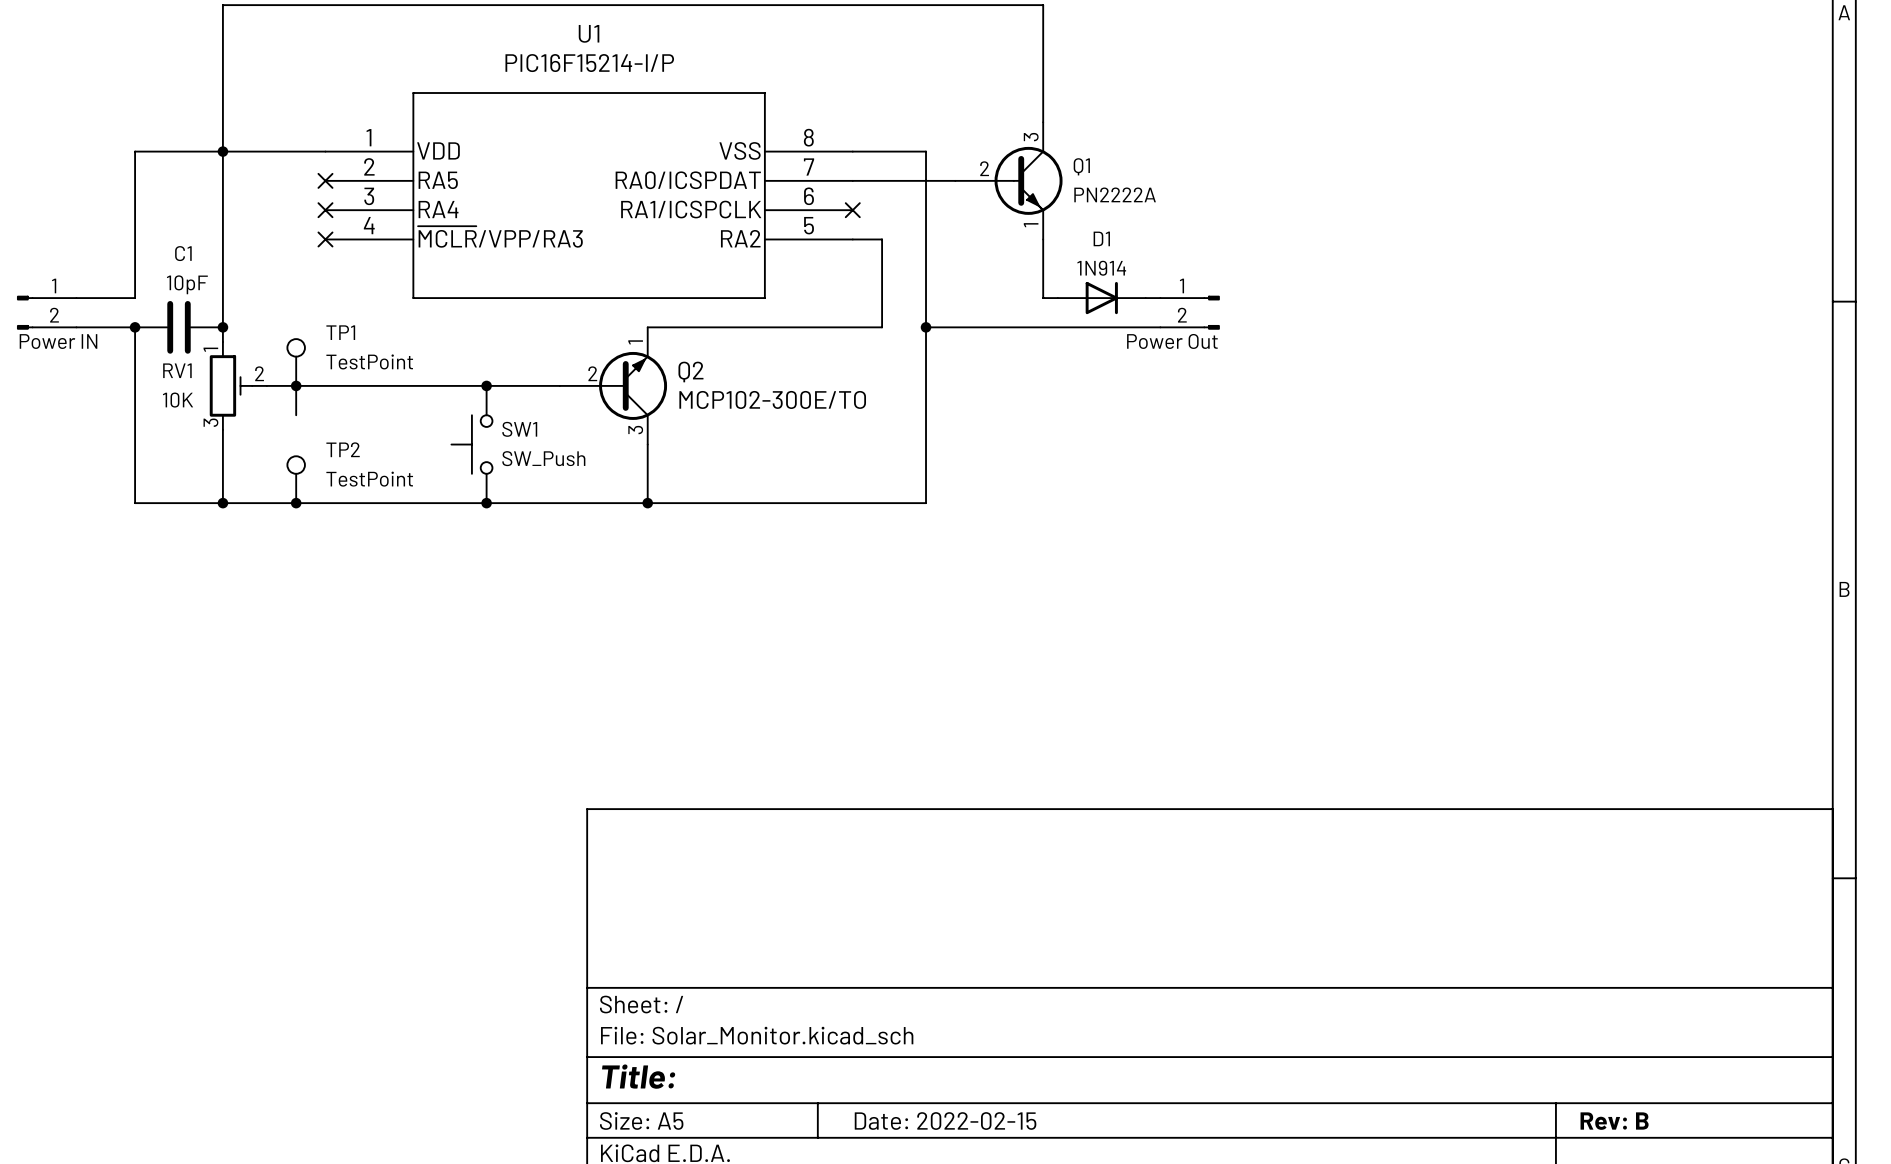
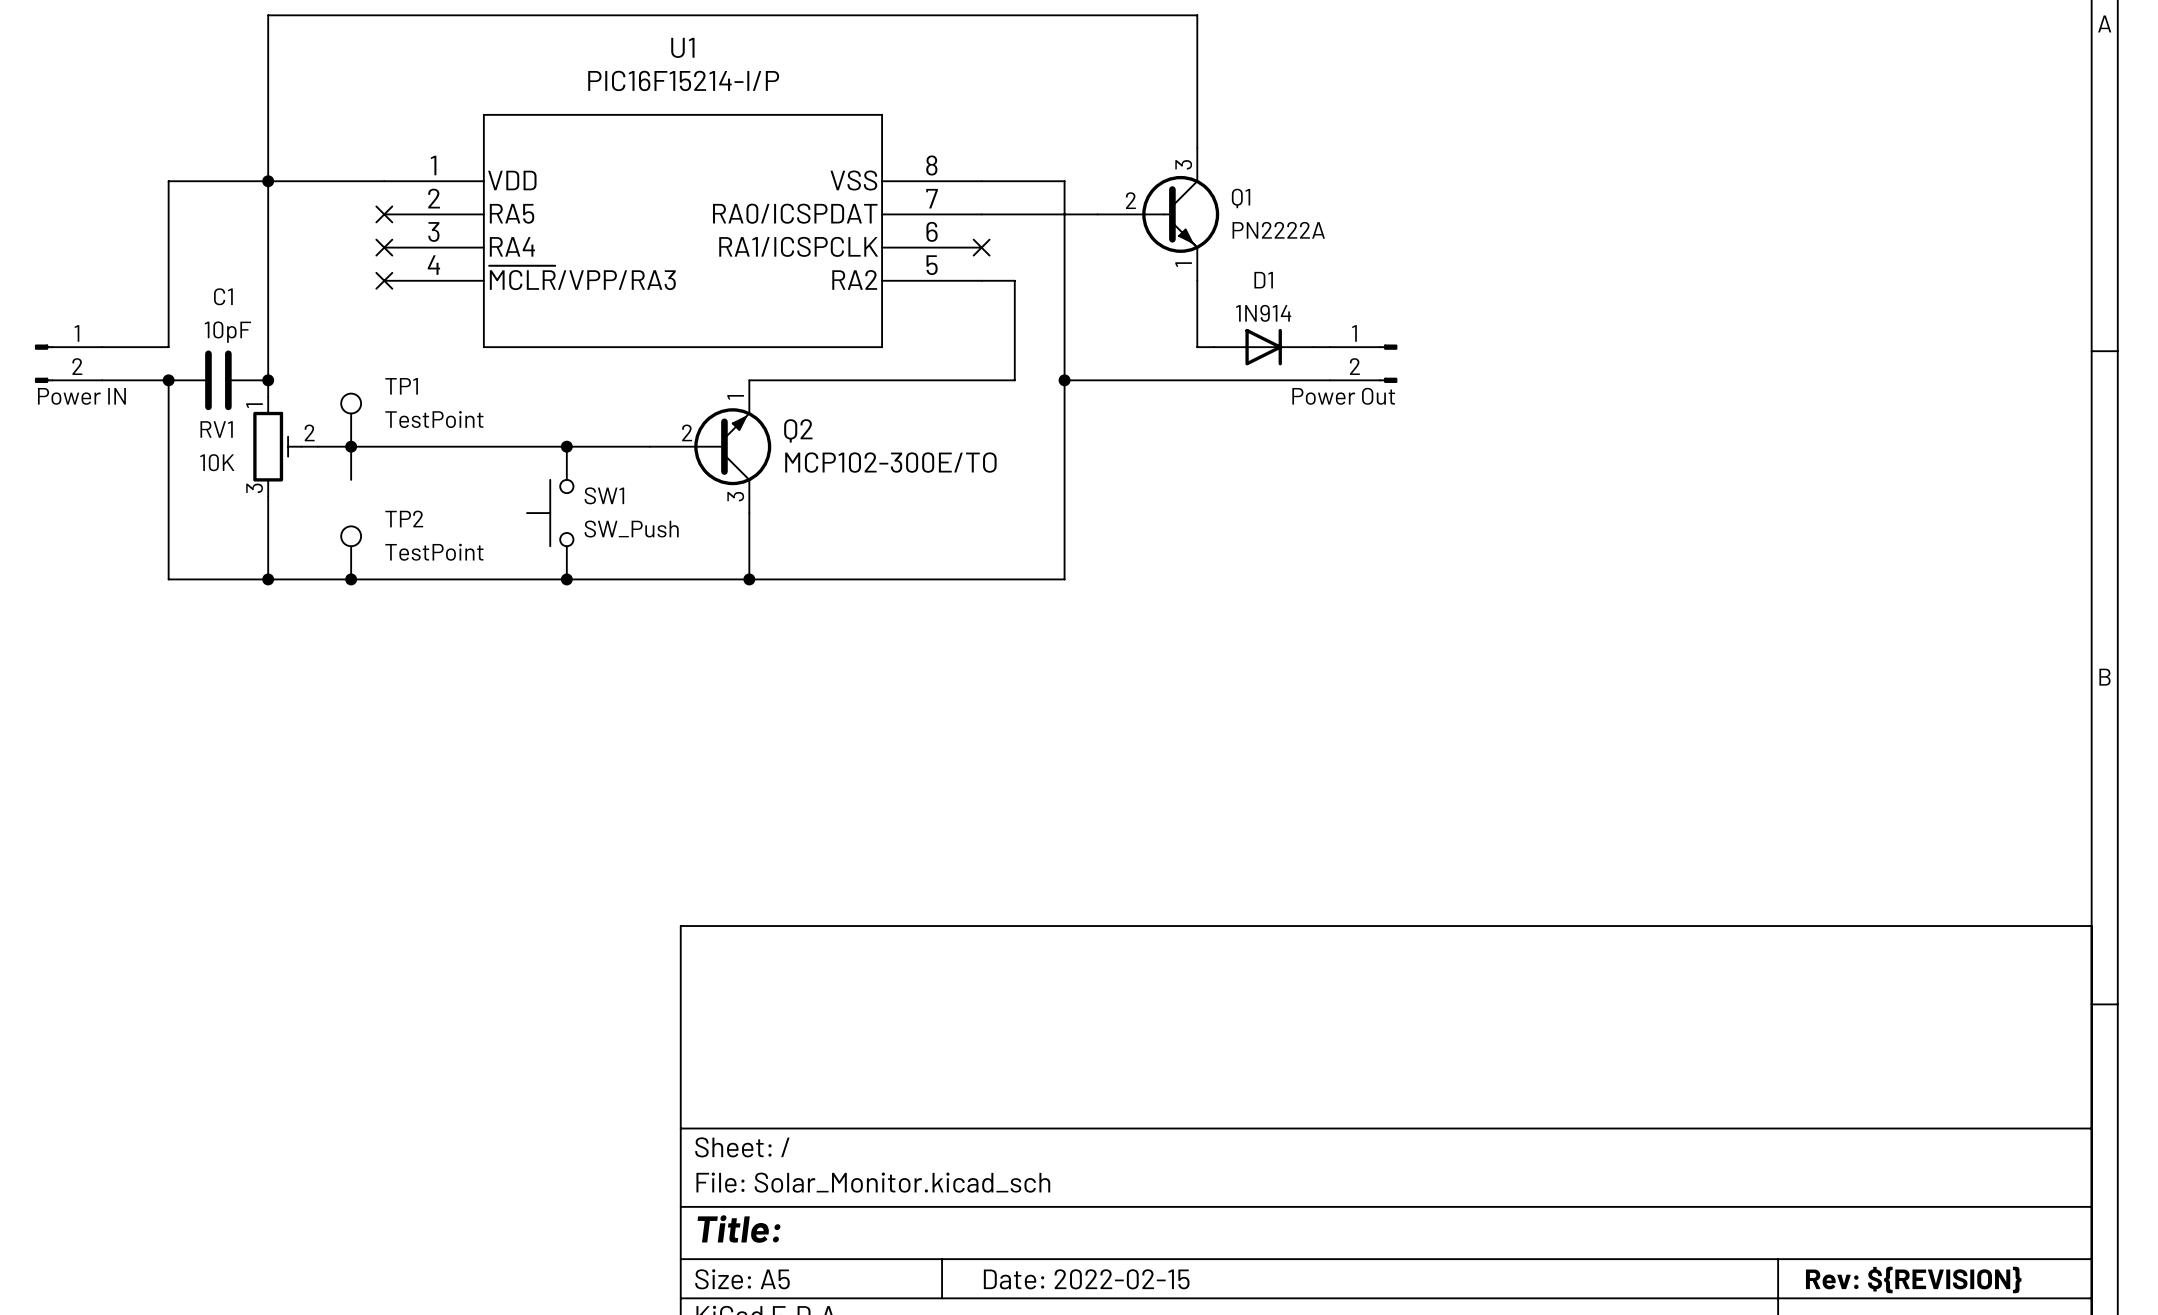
title block: Rev: B (1614, 1121) -> Rev: ${REVISION} (1913, 1279)

